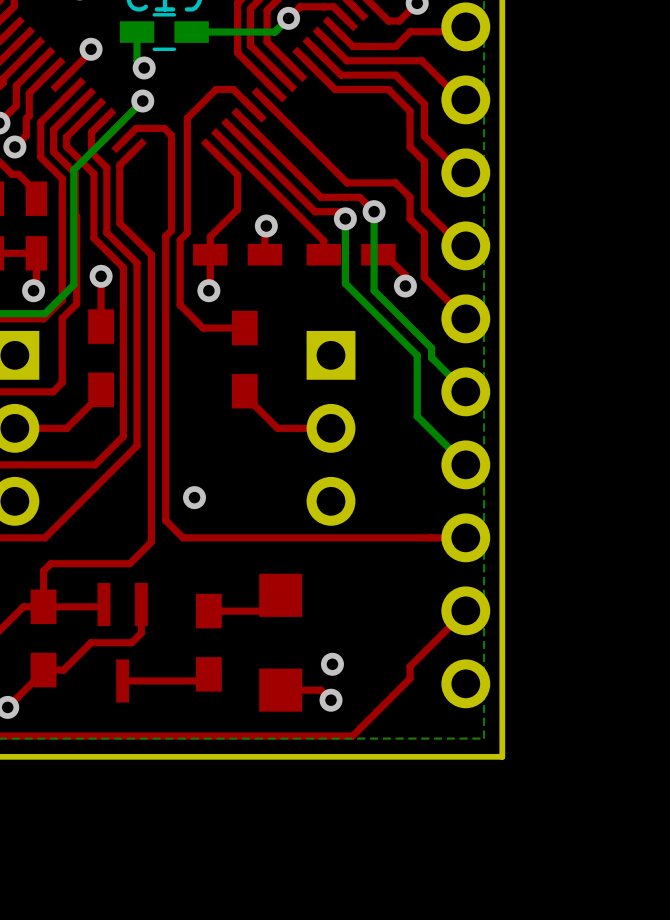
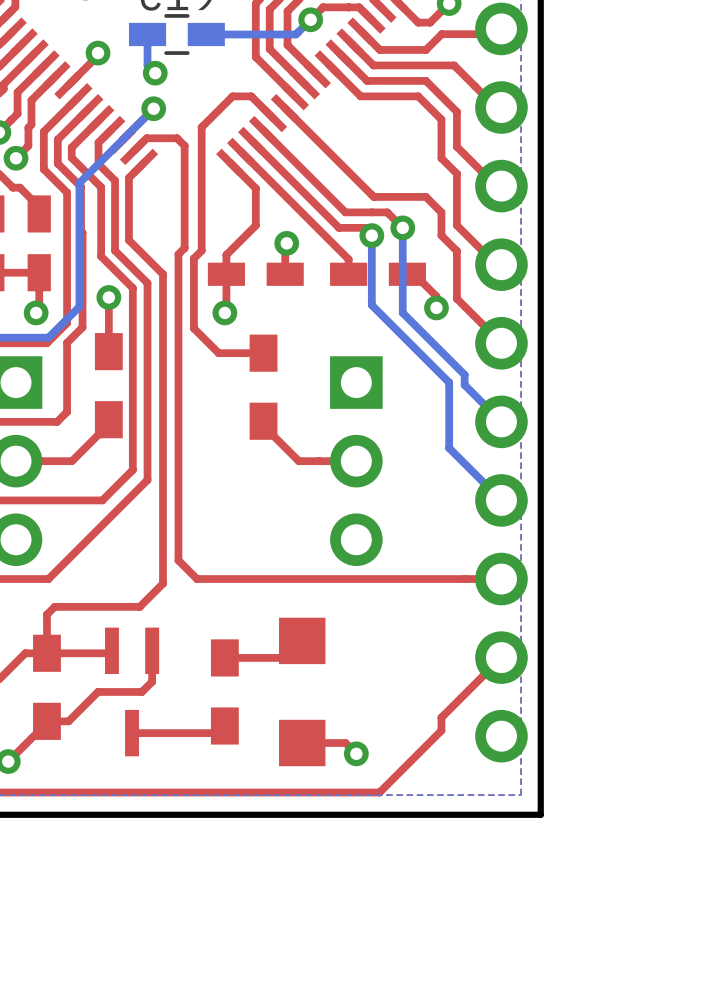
via: (194, 497) -> none
via: (332, 664) -> none

